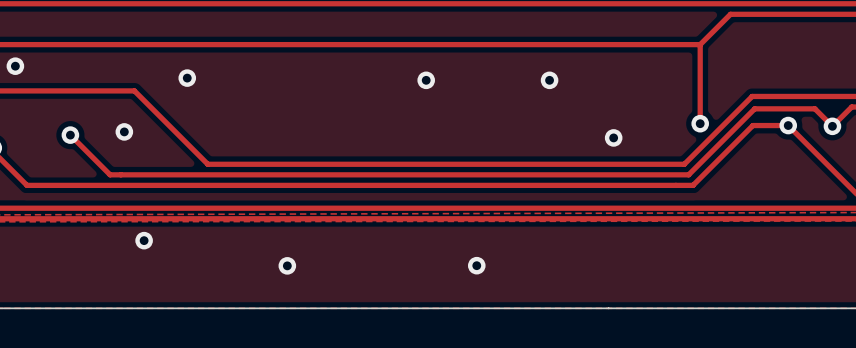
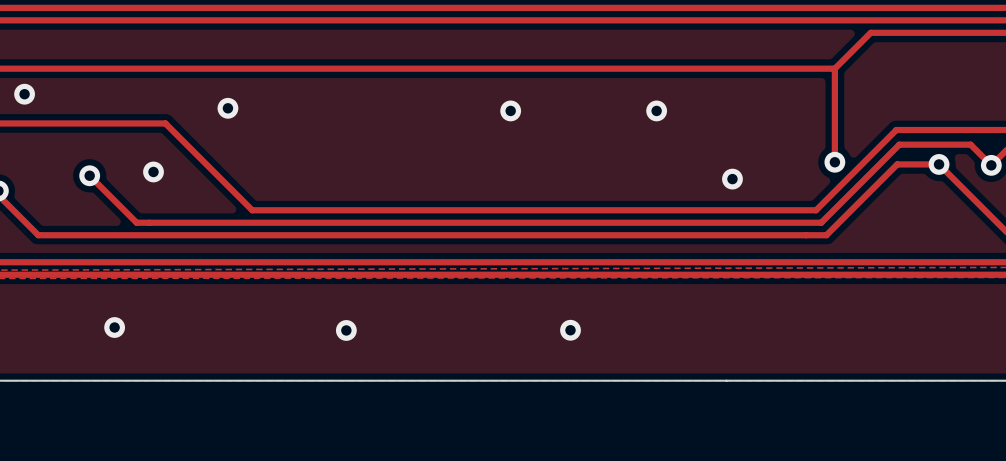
via position: (144, 240) -> (114, 327)

